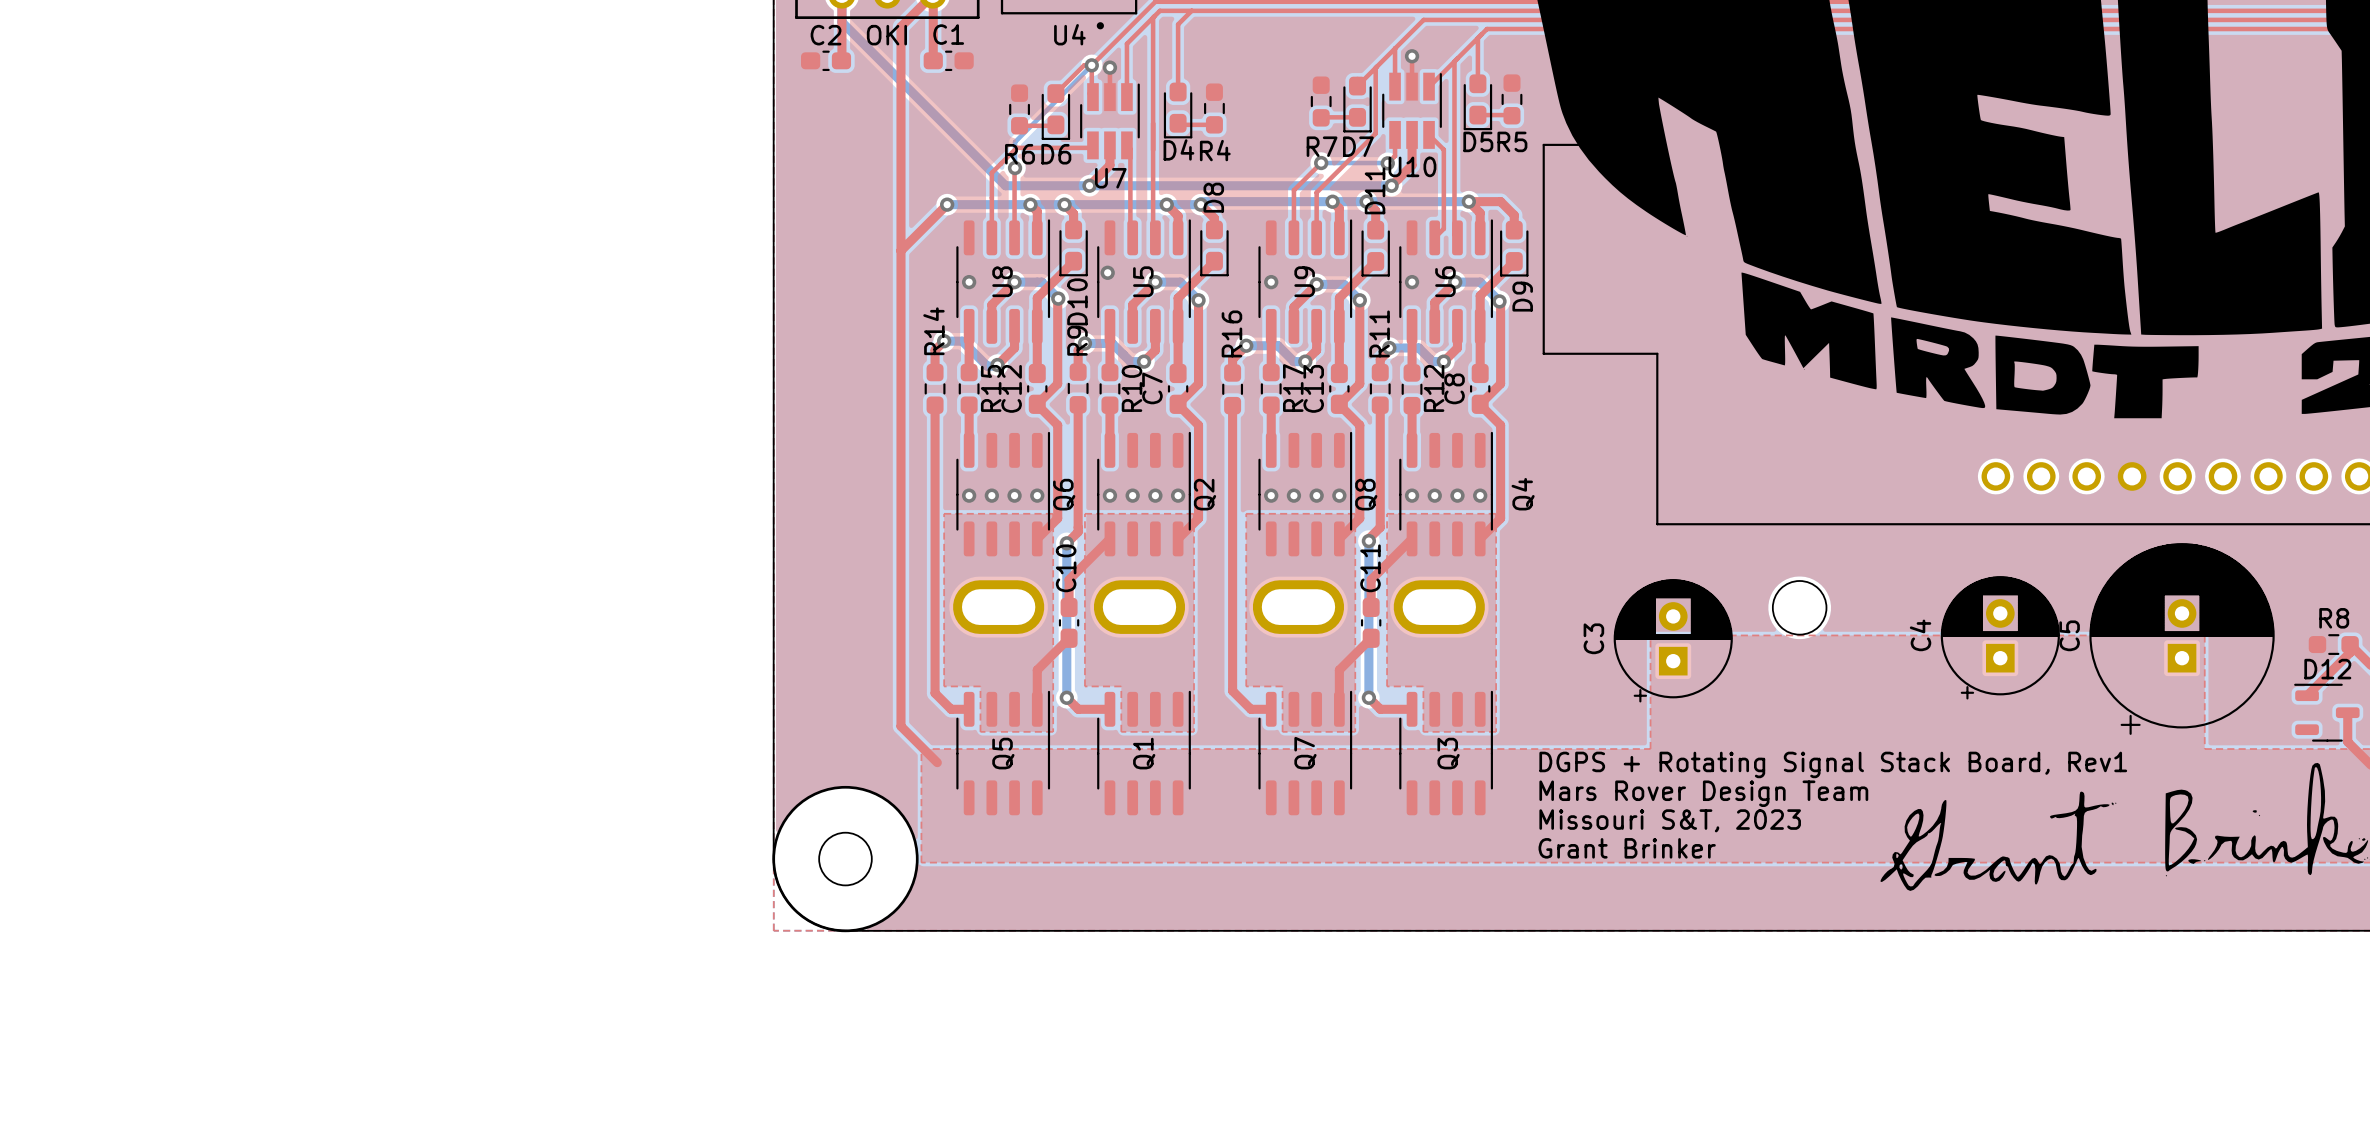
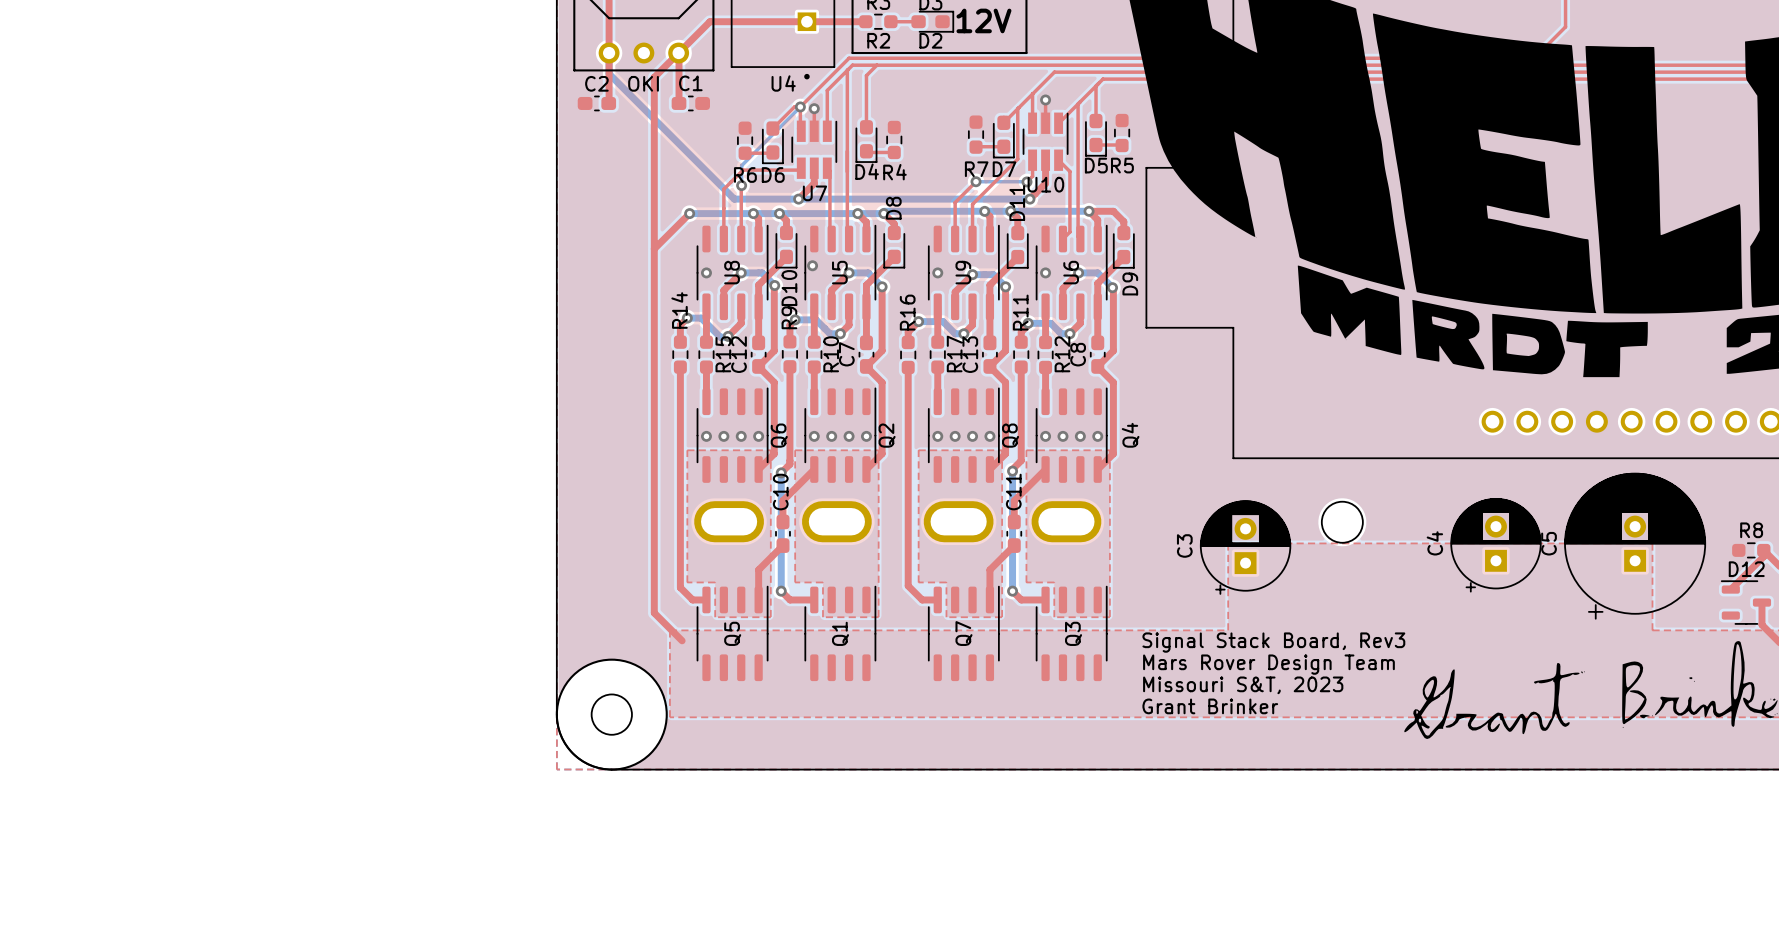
text: DGPS + Rotating Signal Stack Board, Rev1 (1833, 764) -> Signal Stack Board, Rev3 (1273, 642)

